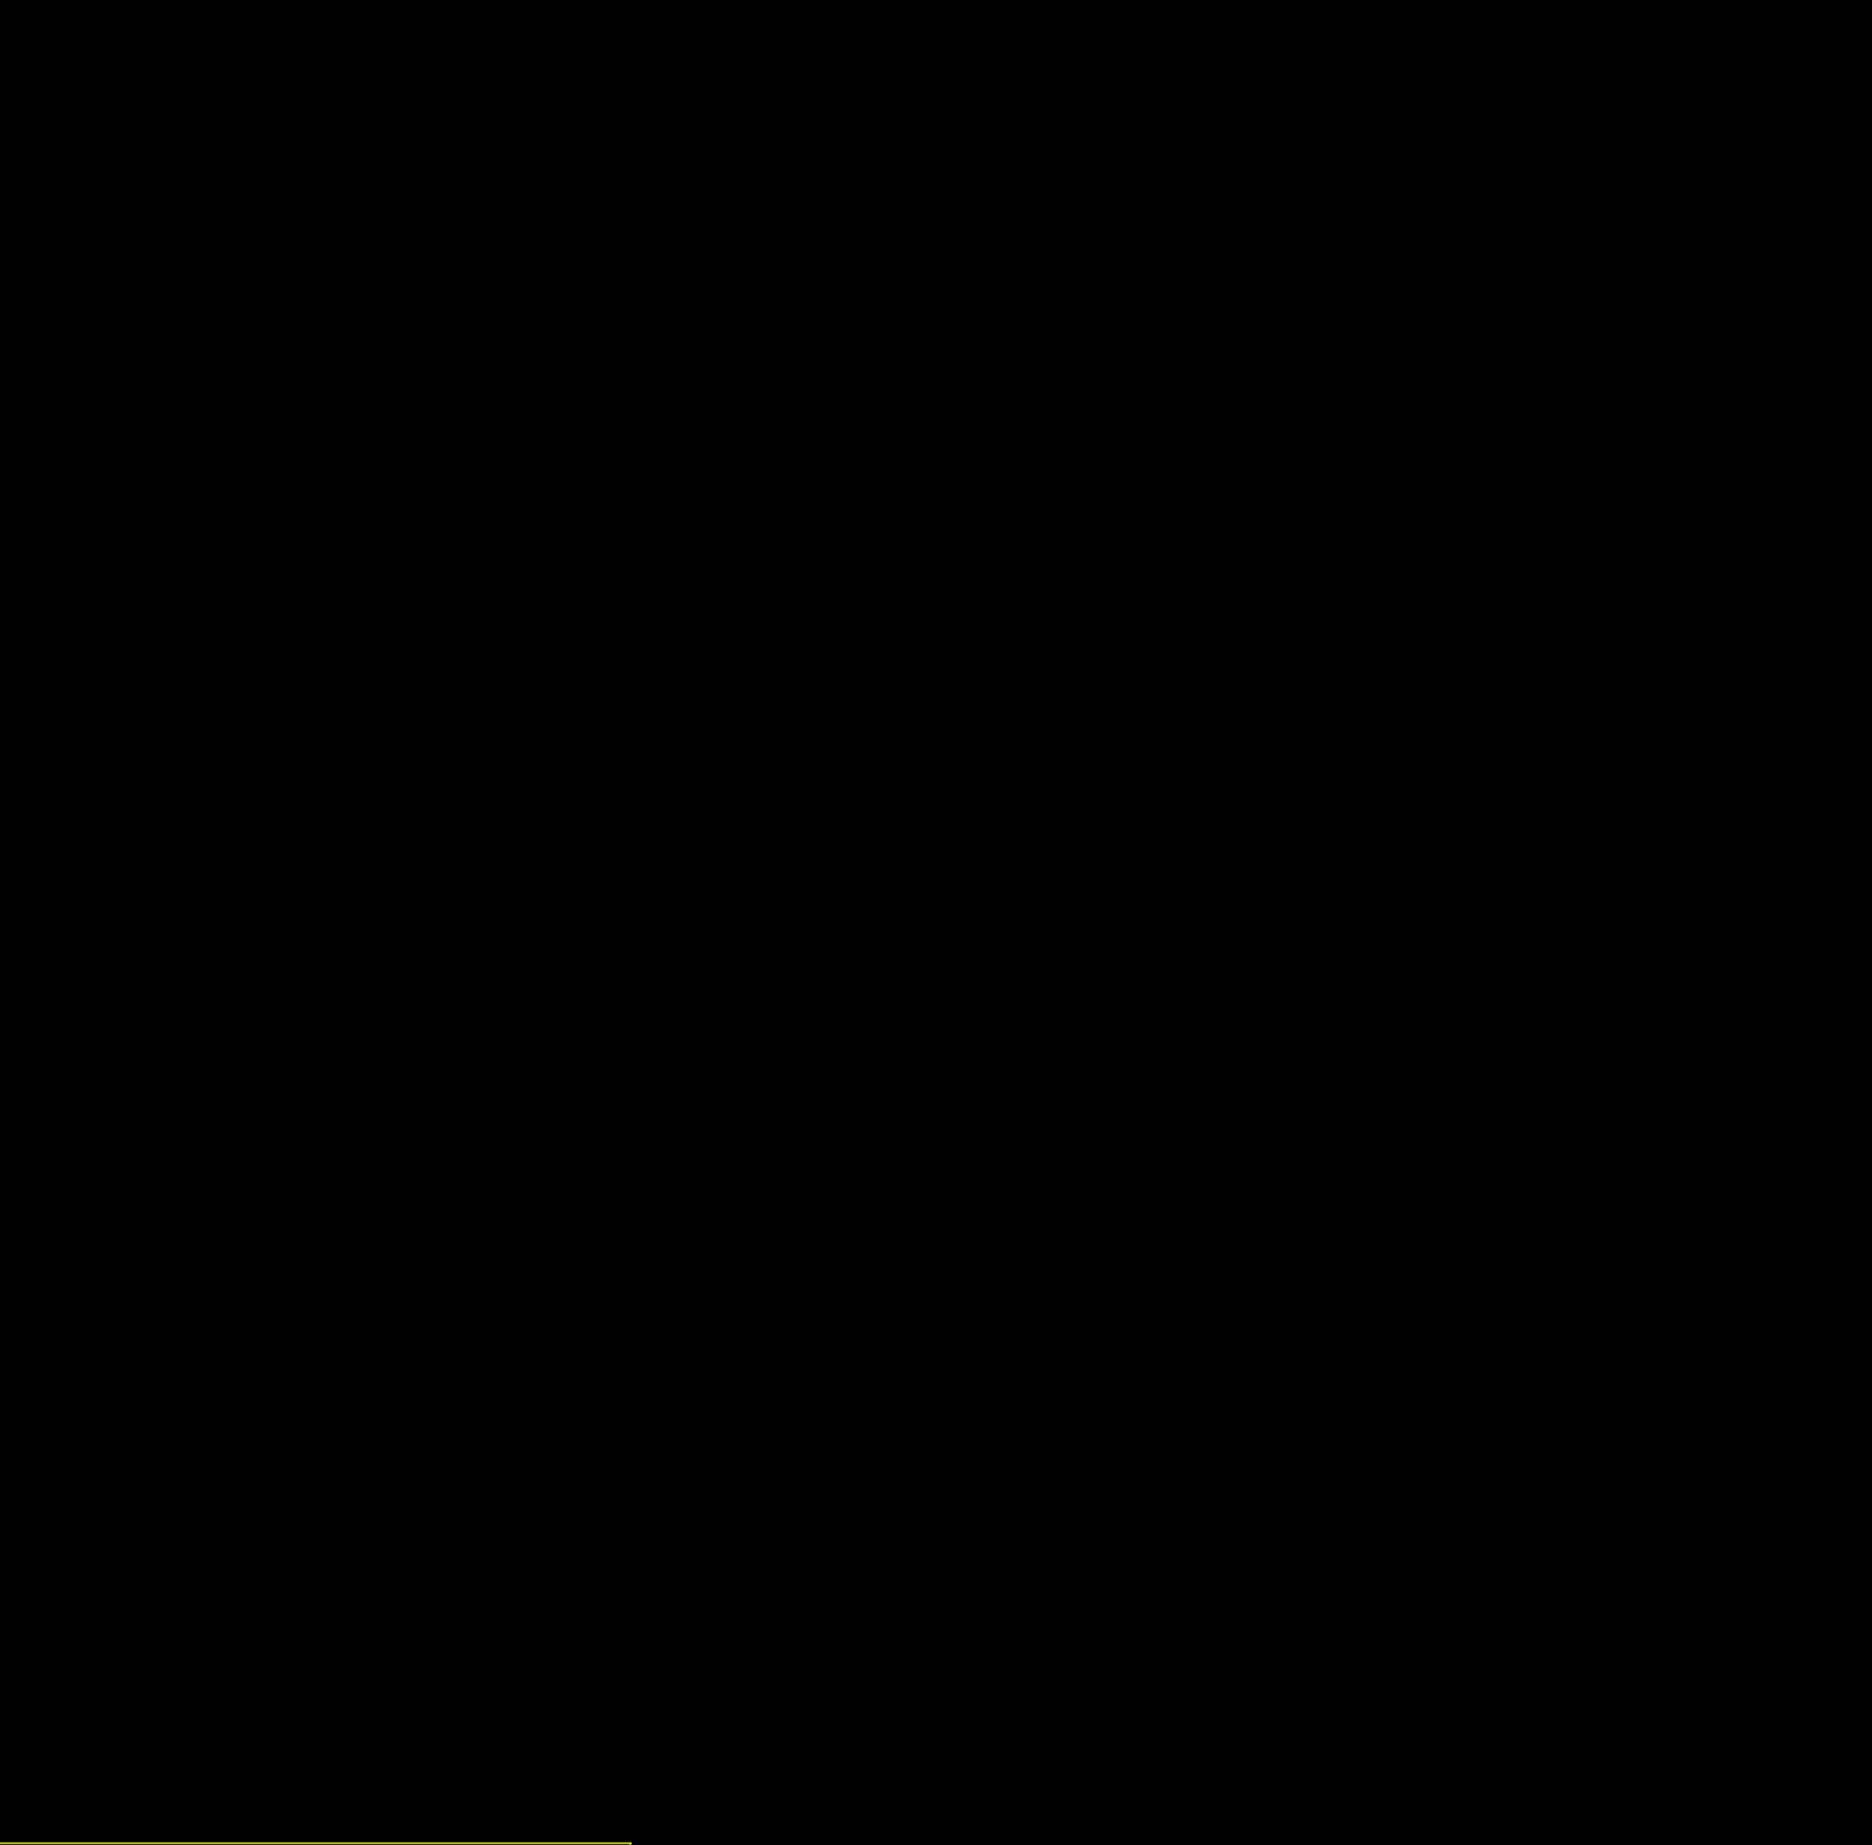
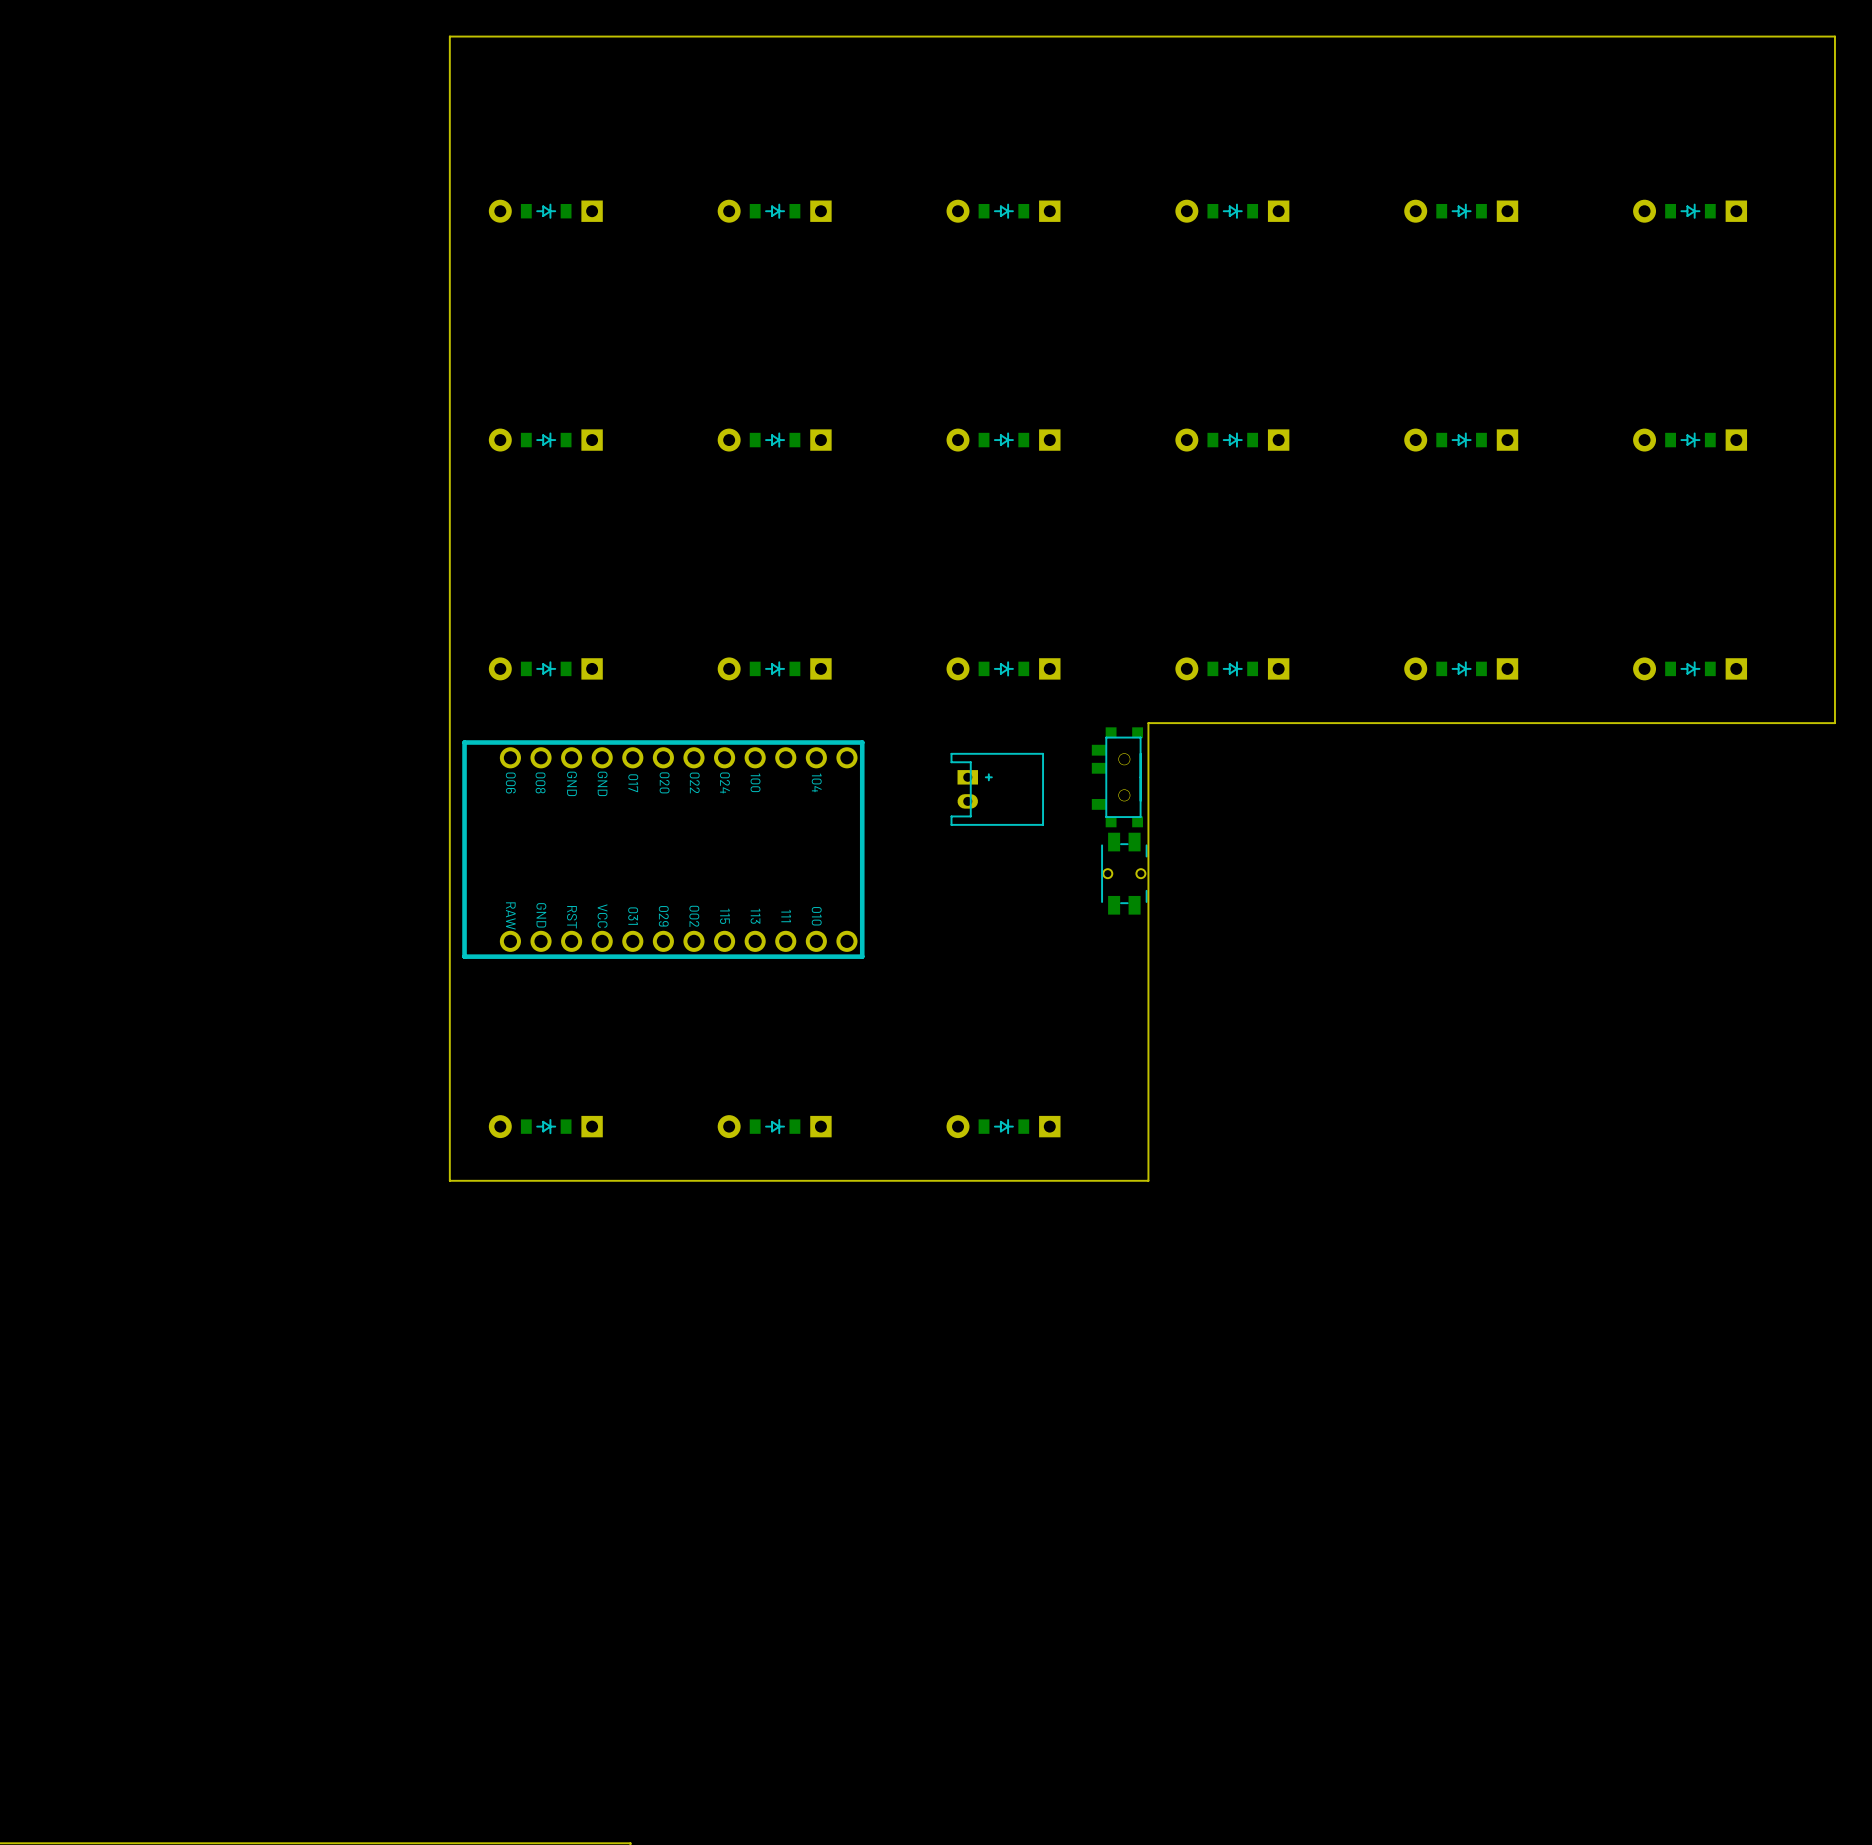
board edge: none -> (1834, 36) (449, 36) (449, 1180) (1148, 1180) (1148, 723) (1834, 723) (1834, 36)
part: none -> (545, 211)
part: none -> (774, 211)
part: none -> (1003, 211)
part: none -> (1232, 211)
part: none -> (1461, 211)
part: none -> (1690, 211)
part: none -> (545, 440)
part: none -> (774, 440)
part: none -> (1003, 440)
part: none -> (1232, 440)
part: none -> (1461, 440)
part: none -> (1690, 440)
part: none -> (545, 668)
part: none -> (774, 668)
part: none -> (1003, 668)
part: none -> (1232, 668)
part: none -> (1461, 668)
part: none -> (1690, 668)
part: none -> (1117, 777)
part: none -> (997, 789)
part: none -> (663, 849)
part: none -> (1124, 873)
part: none -> (545, 1126)
part: none -> (774, 1126)
part: none -> (1003, 1126)

